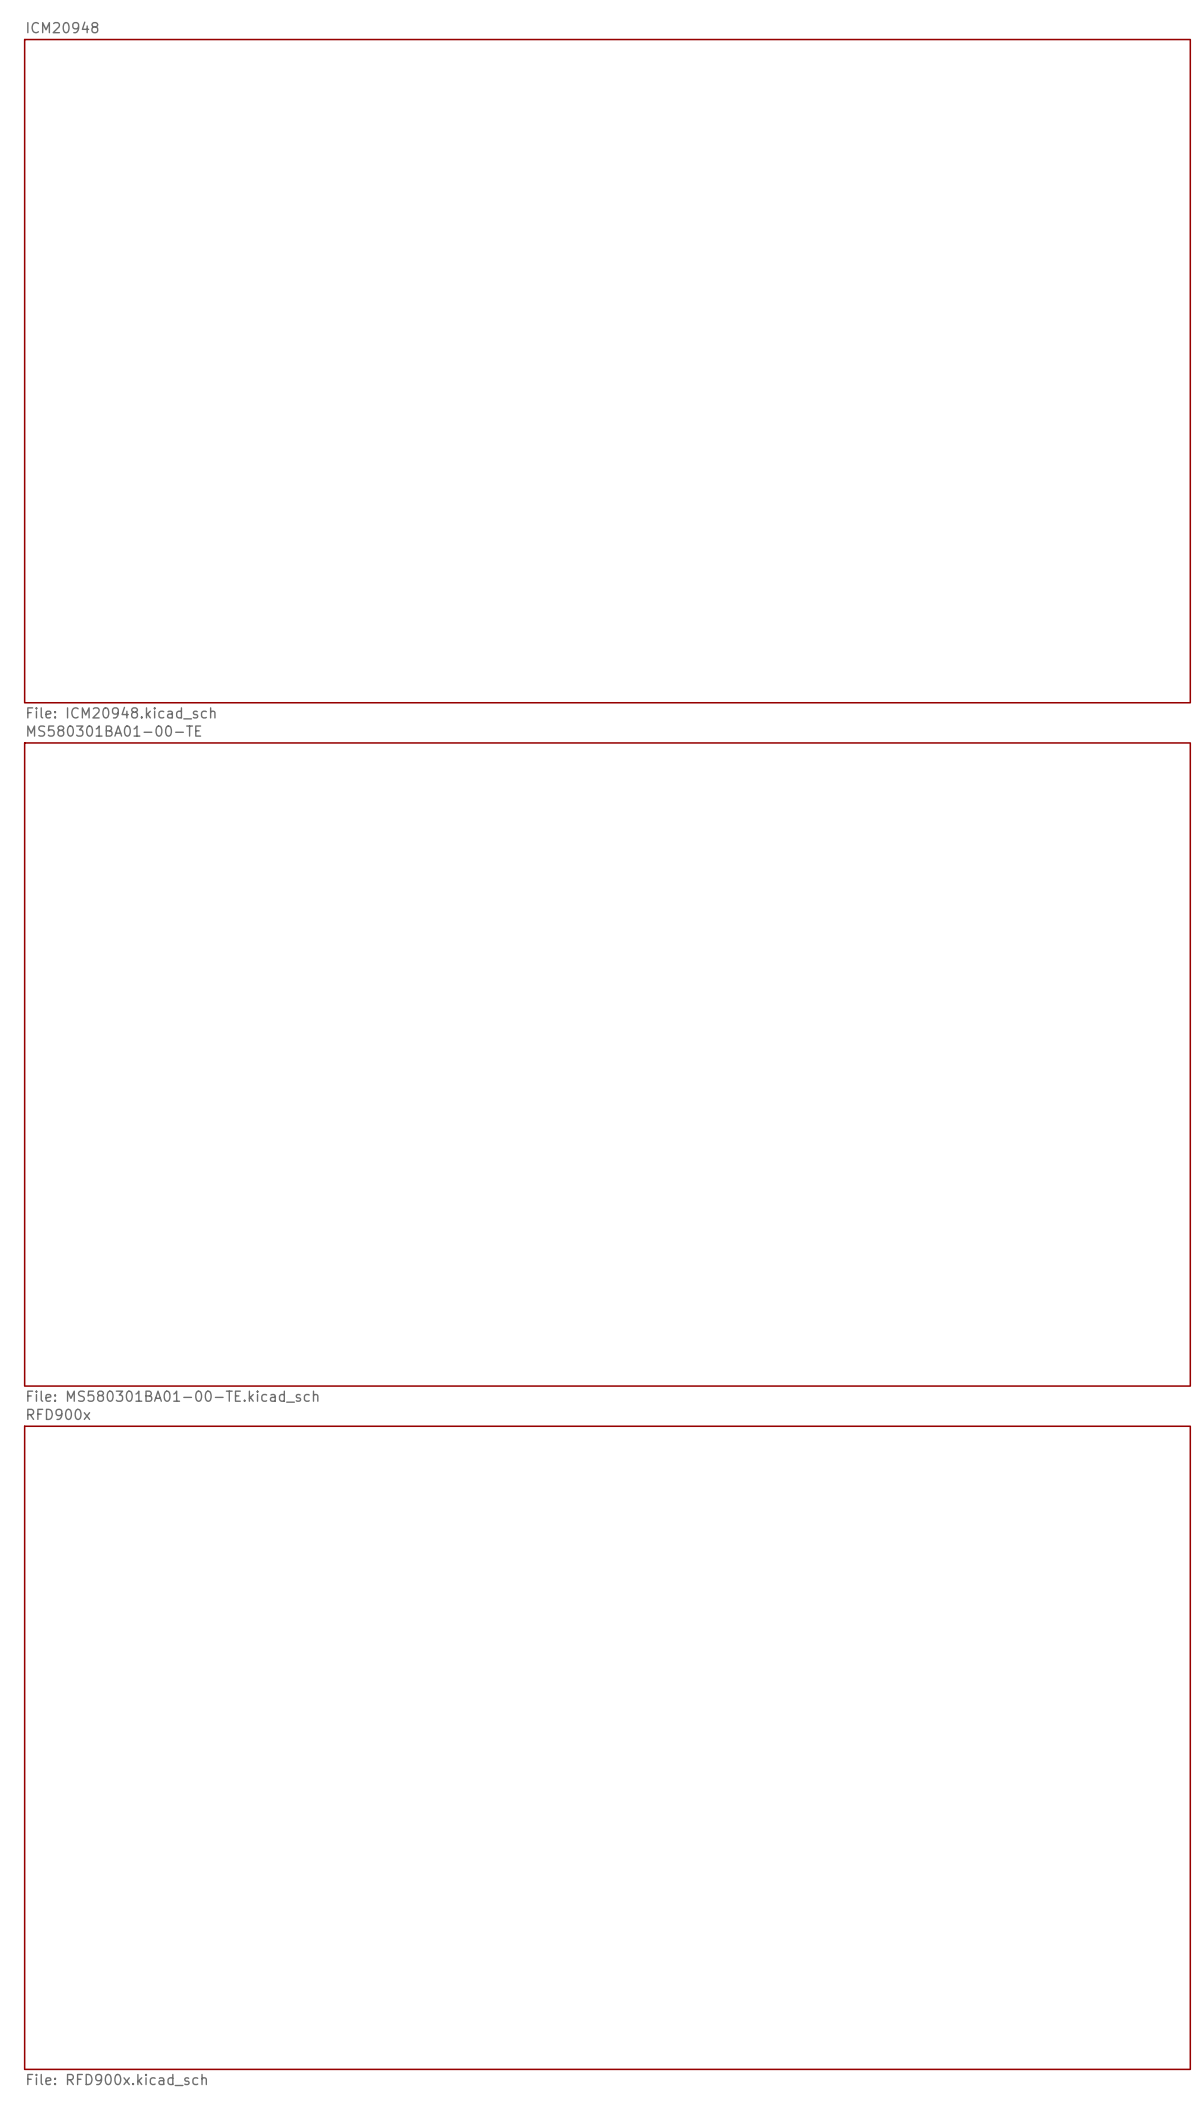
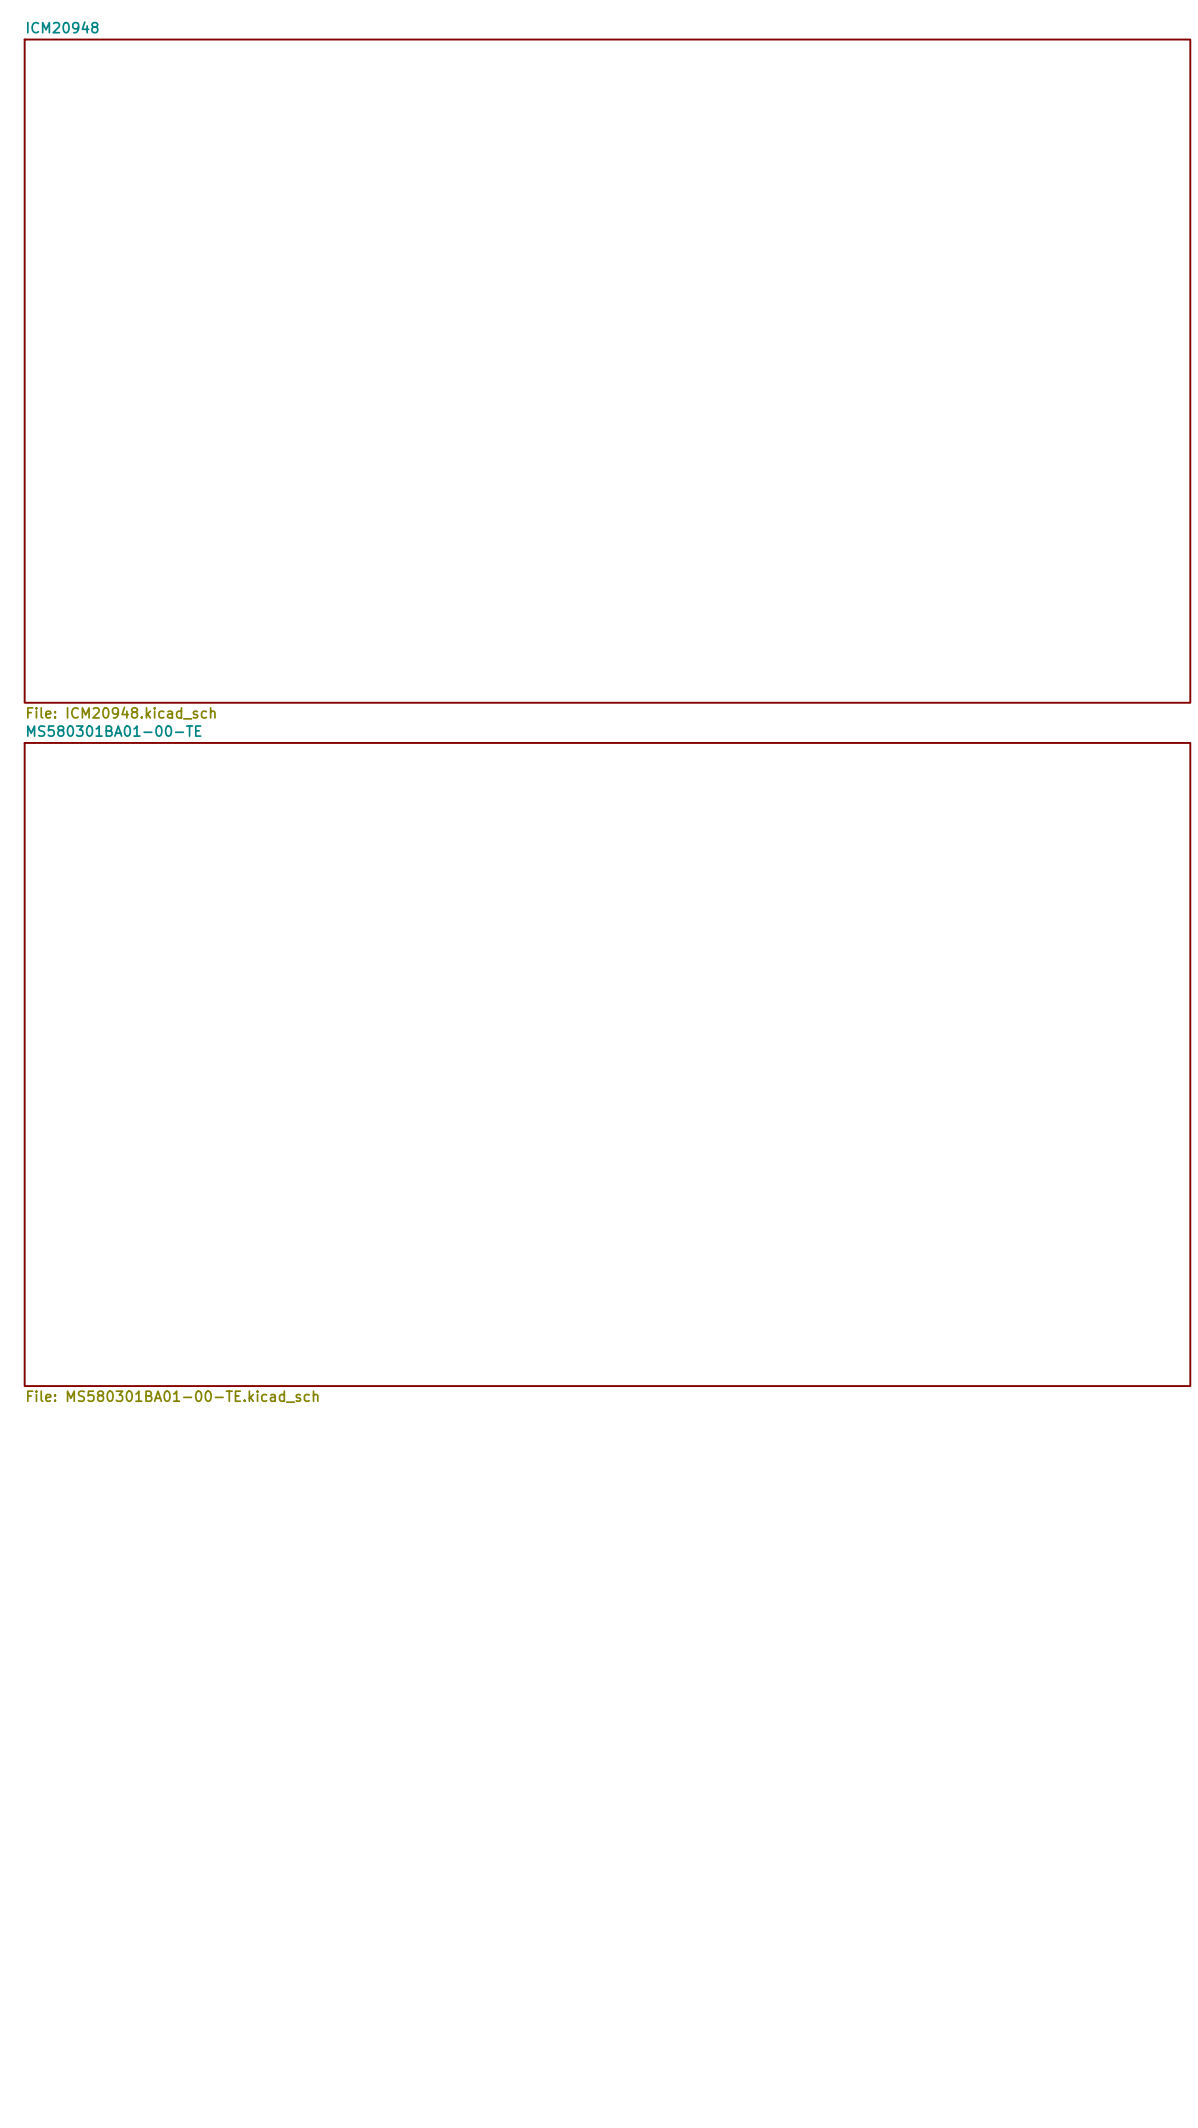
sheet RFD900x: File: RFD900x.kicad_sch (607, 1747) -> none

